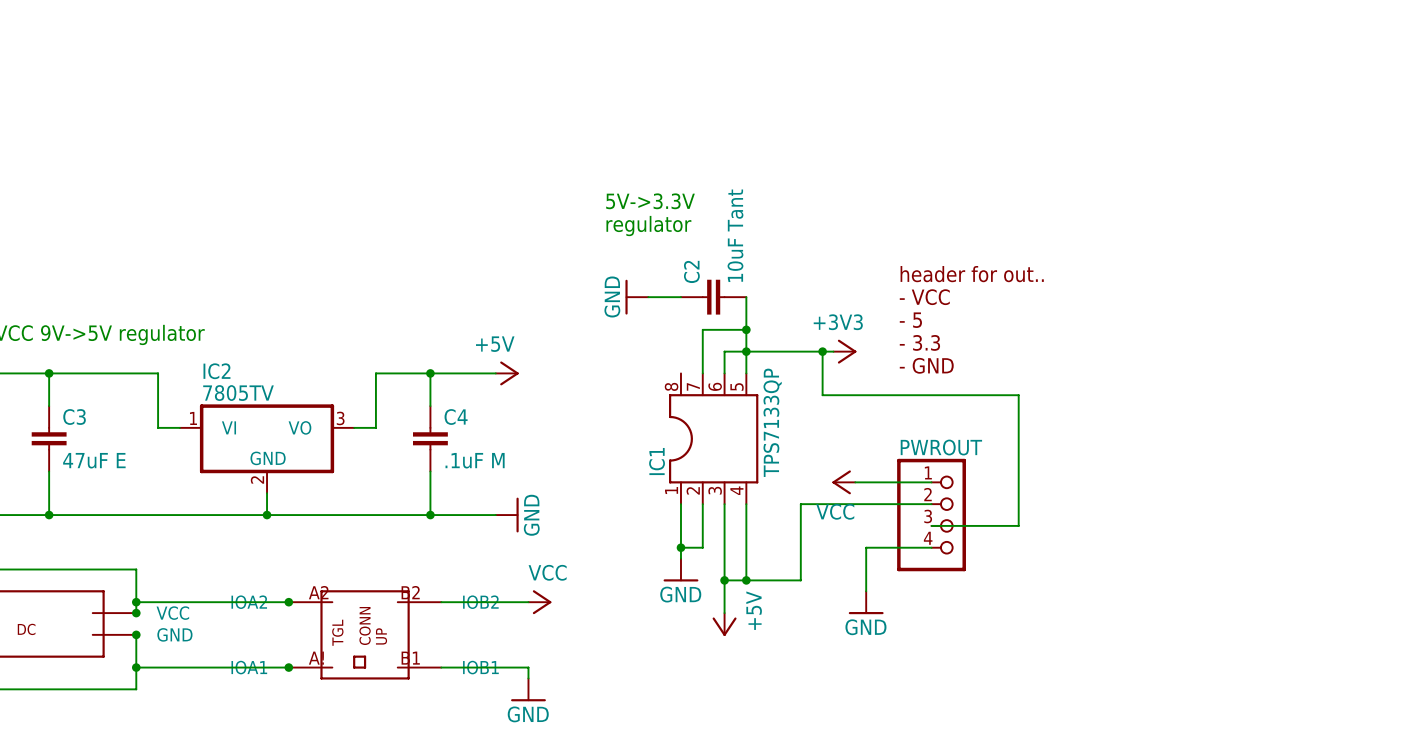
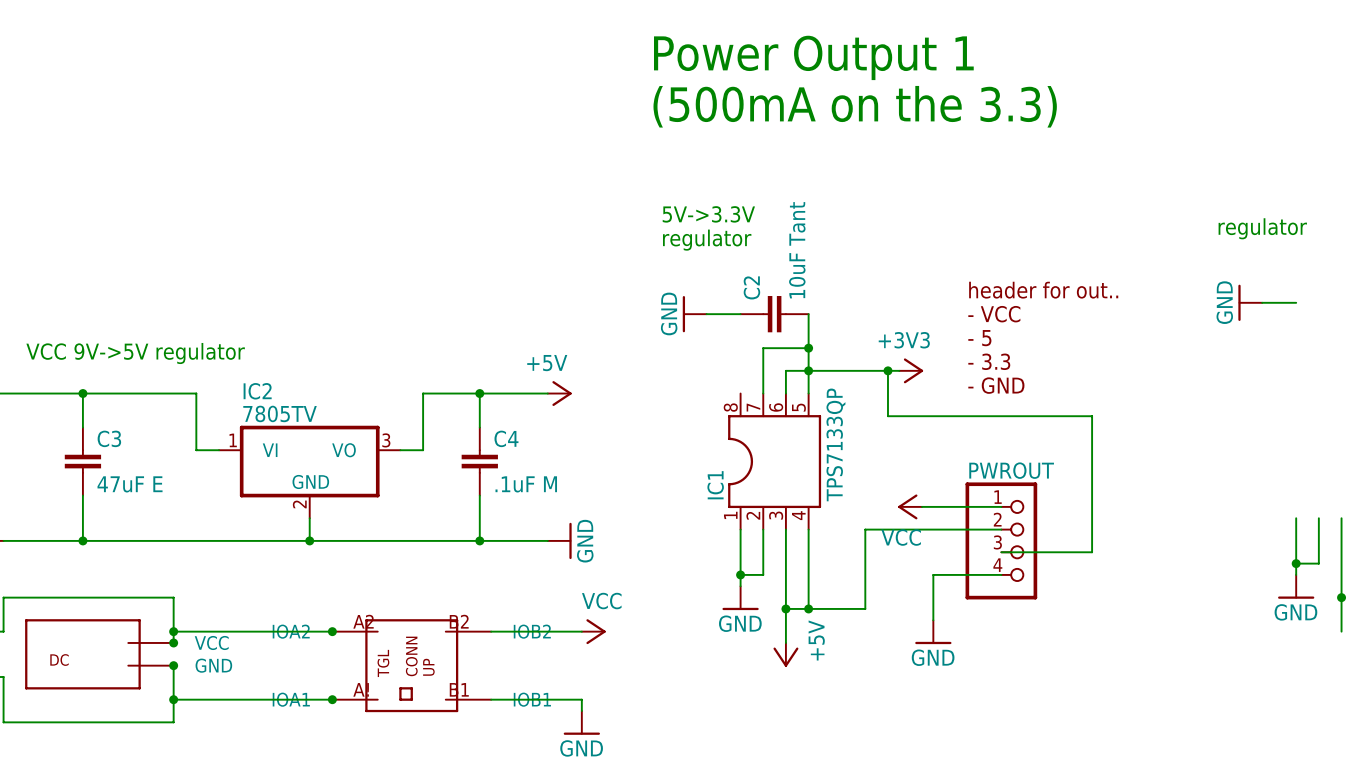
text: none -> Power Output 1 (813, 57)
text: none -> (500mA on the 3.3) (855, 106)
text: none -> regulator (1262, 228)
power symbol: none -> GND (1250, 302)
wire: none -> (1262, 302) (1296, 302)
wire: none -> (1296, 518) (1296, 574)
wire: none -> (1318, 518) (1318, 563) (1296, 563)
wire: none -> (1341, 518) (1341, 631)
junction: none -> (1296, 563)
power symbol: none -> GND (1296, 586)
junction: none -> (1341, 597)

